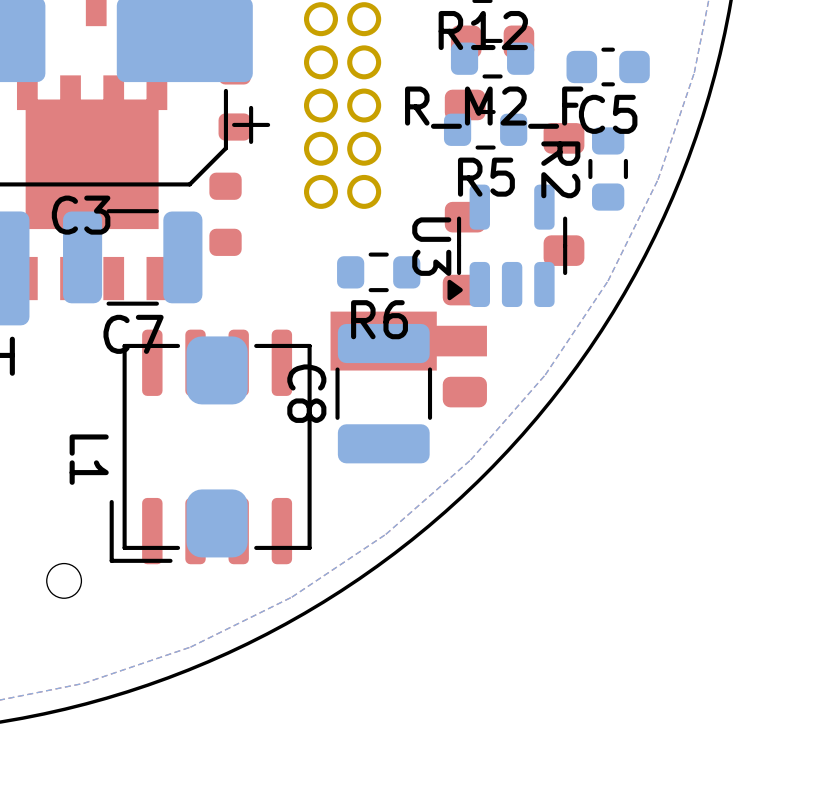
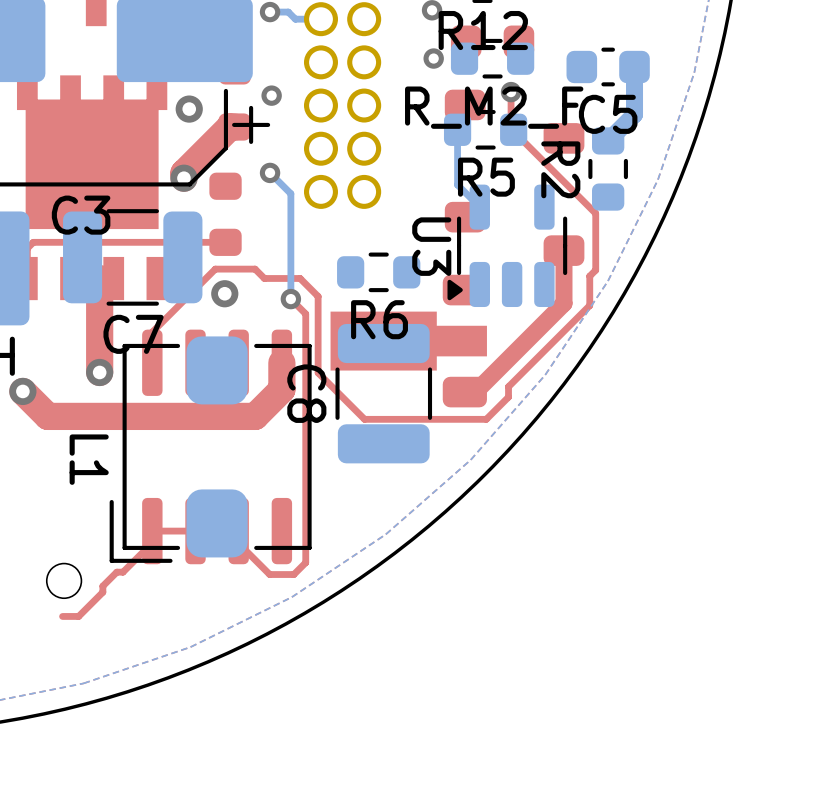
via: none -> (432, 10)
bottom track: none -> (270, 12) (288, 12) (295, 19) (320, 19)
via: none -> (270, 12)
via: none -> (433, 58)
bottom track: none -> (634, 66) (634, 114) (608, 140)
top track: none -> (511, 92) (511, 128) (595, 213) (595, 270) (589, 276) (589, 305) (508, 386) (508, 397) (486, 419) (364, 419) (318, 372) (318, 296) (300, 278) (264, 278) (255, 269) (215, 269) (152, 332) (152, 362)
via: none -> (511, 92)
via: none -> (271, 95)
via: none -> (189, 109)
top track: none -> (234, 127) (229, 127) (183, 172) (183, 178)
bottom track: none -> (457, 129) (457, 184) (479, 207)
bottom track: none -> (270, 172) (290, 193) (290, 299)
via: none -> (270, 172)
via: none -> (183, 178)
top track: none -> (225, 242) (33, 242) (27, 248) (27, 278)
top track: none -> (563, 250) (563, 303) (475, 392) (464, 392)
top track: none -> (99, 278) (99, 372)
via: none -> (224, 293)
top track: none -> (290, 299) (305, 313) (305, 562) (293, 574) (269, 574) (238, 543) (238, 531) (152, 531) (152, 542) (123, 572) (116, 572) (102, 586) (102, 592) (78, 616) (62, 616)
via: none -> (290, 299)
top track: none -> (281, 362) (281, 389) (255, 416) (47, 416) (22, 391)
via: none -> (99, 372)
via: none -> (22, 391)

